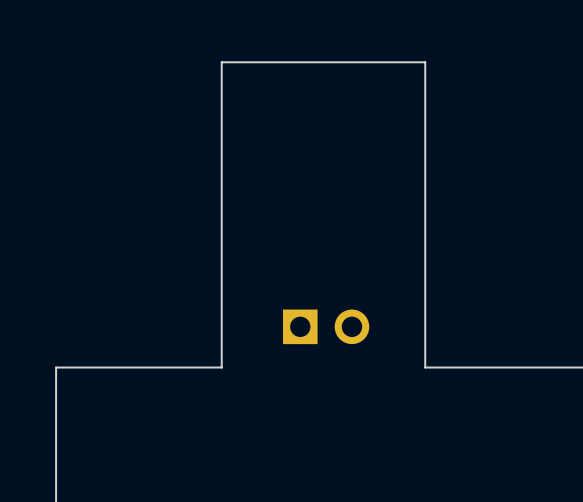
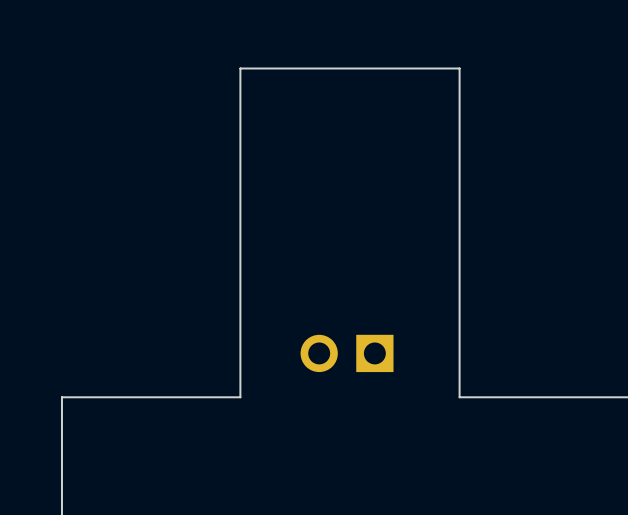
part rotation: 0° (326, 326) -> 180° (347, 353)

